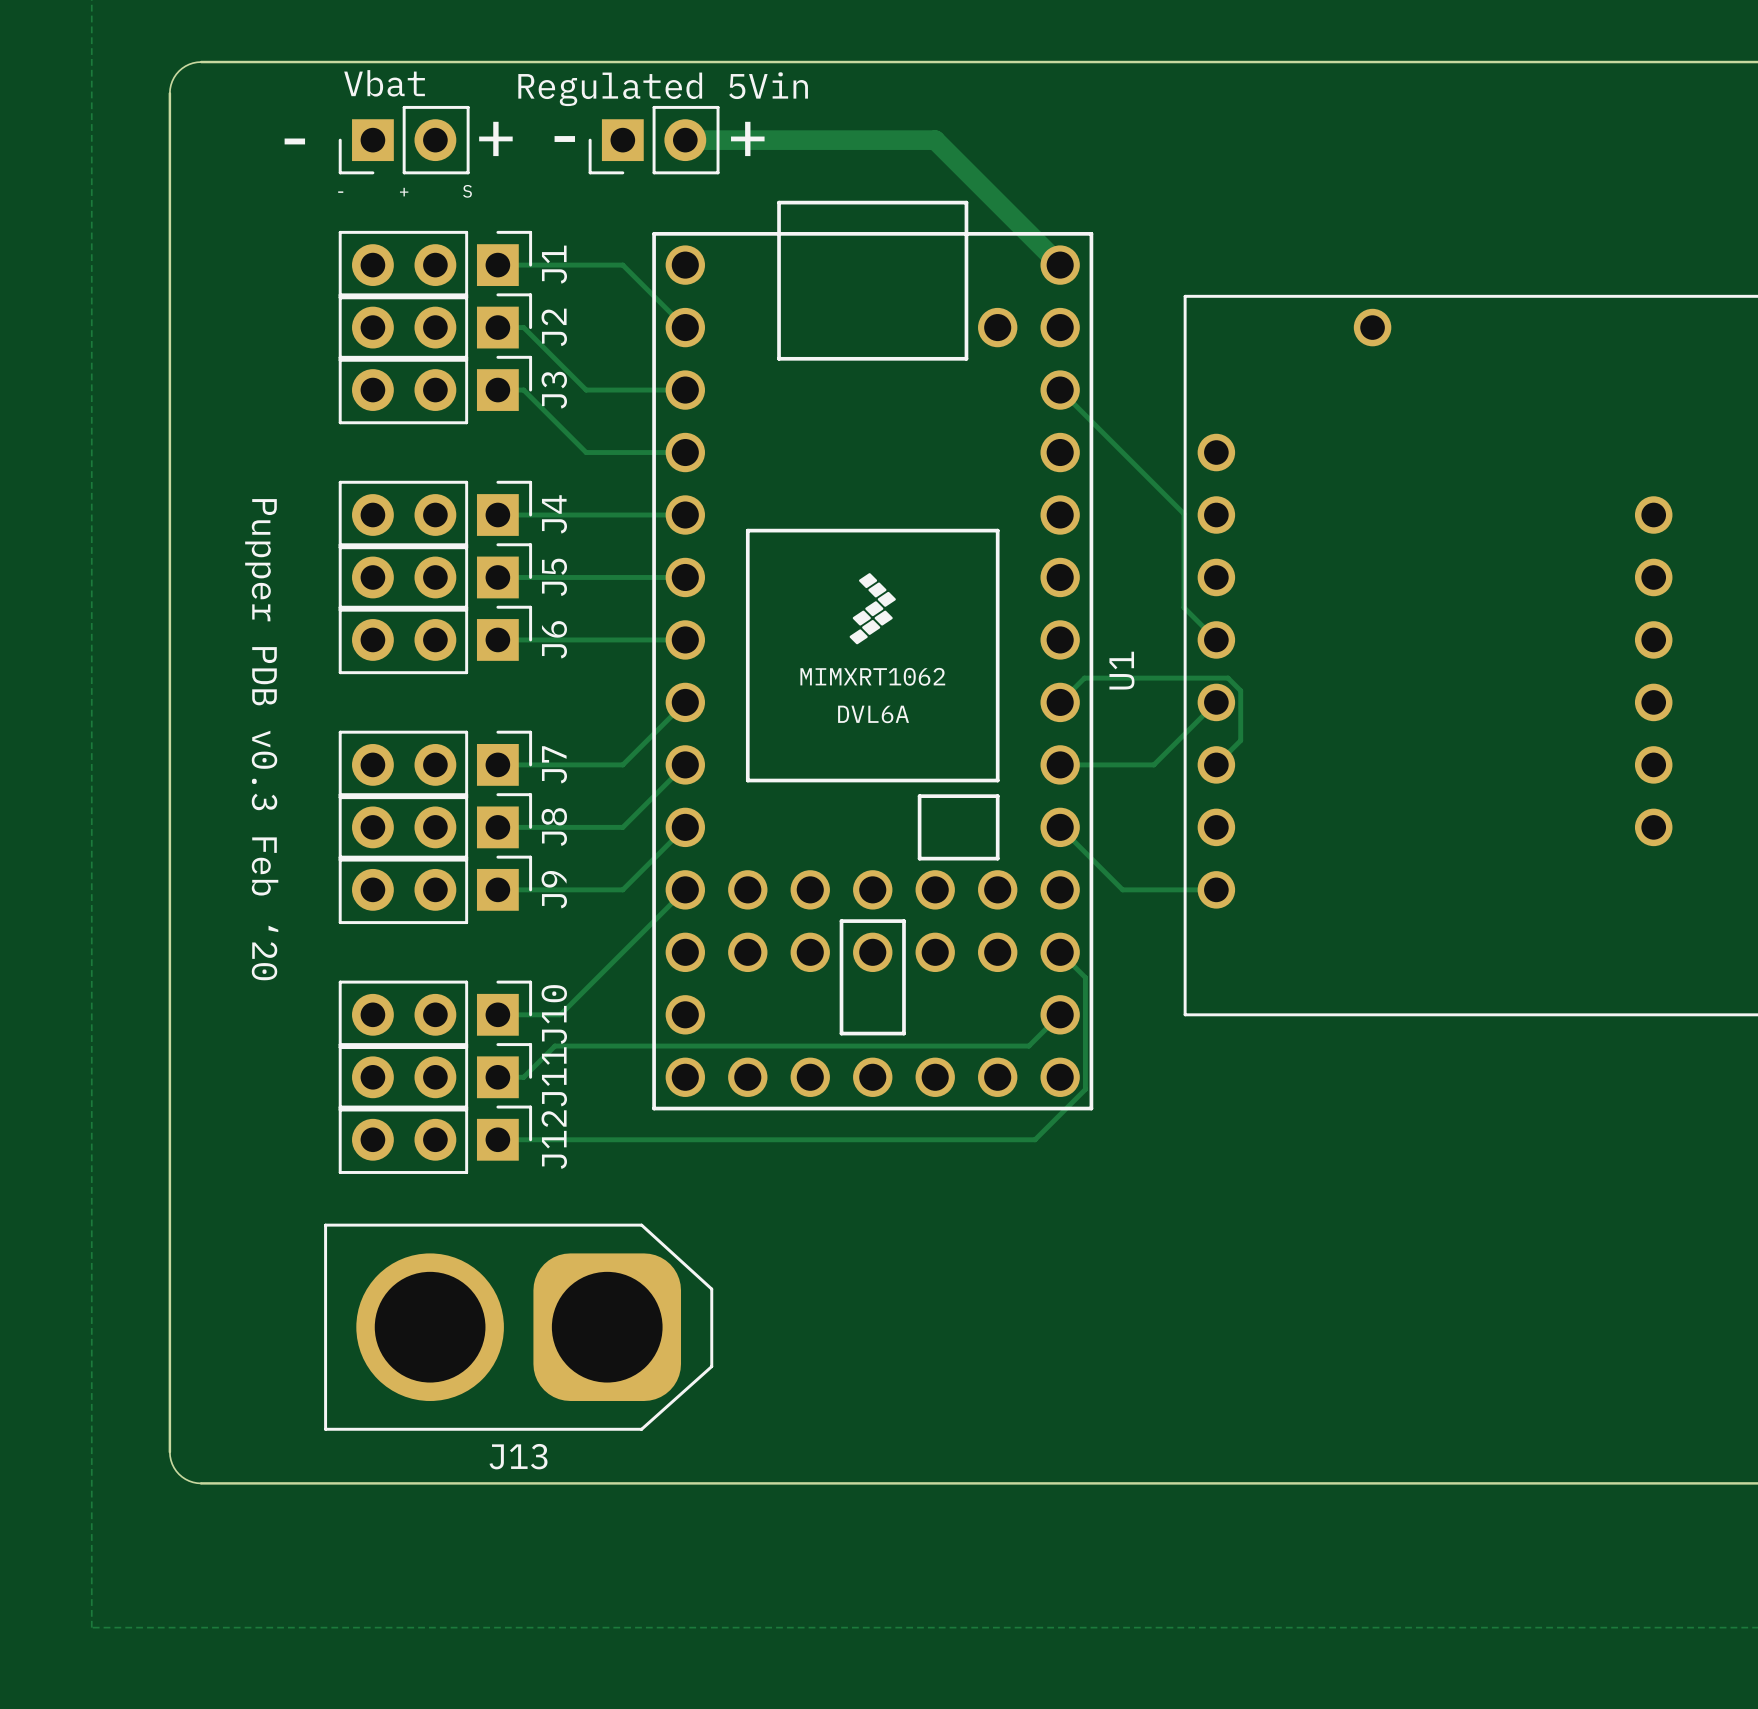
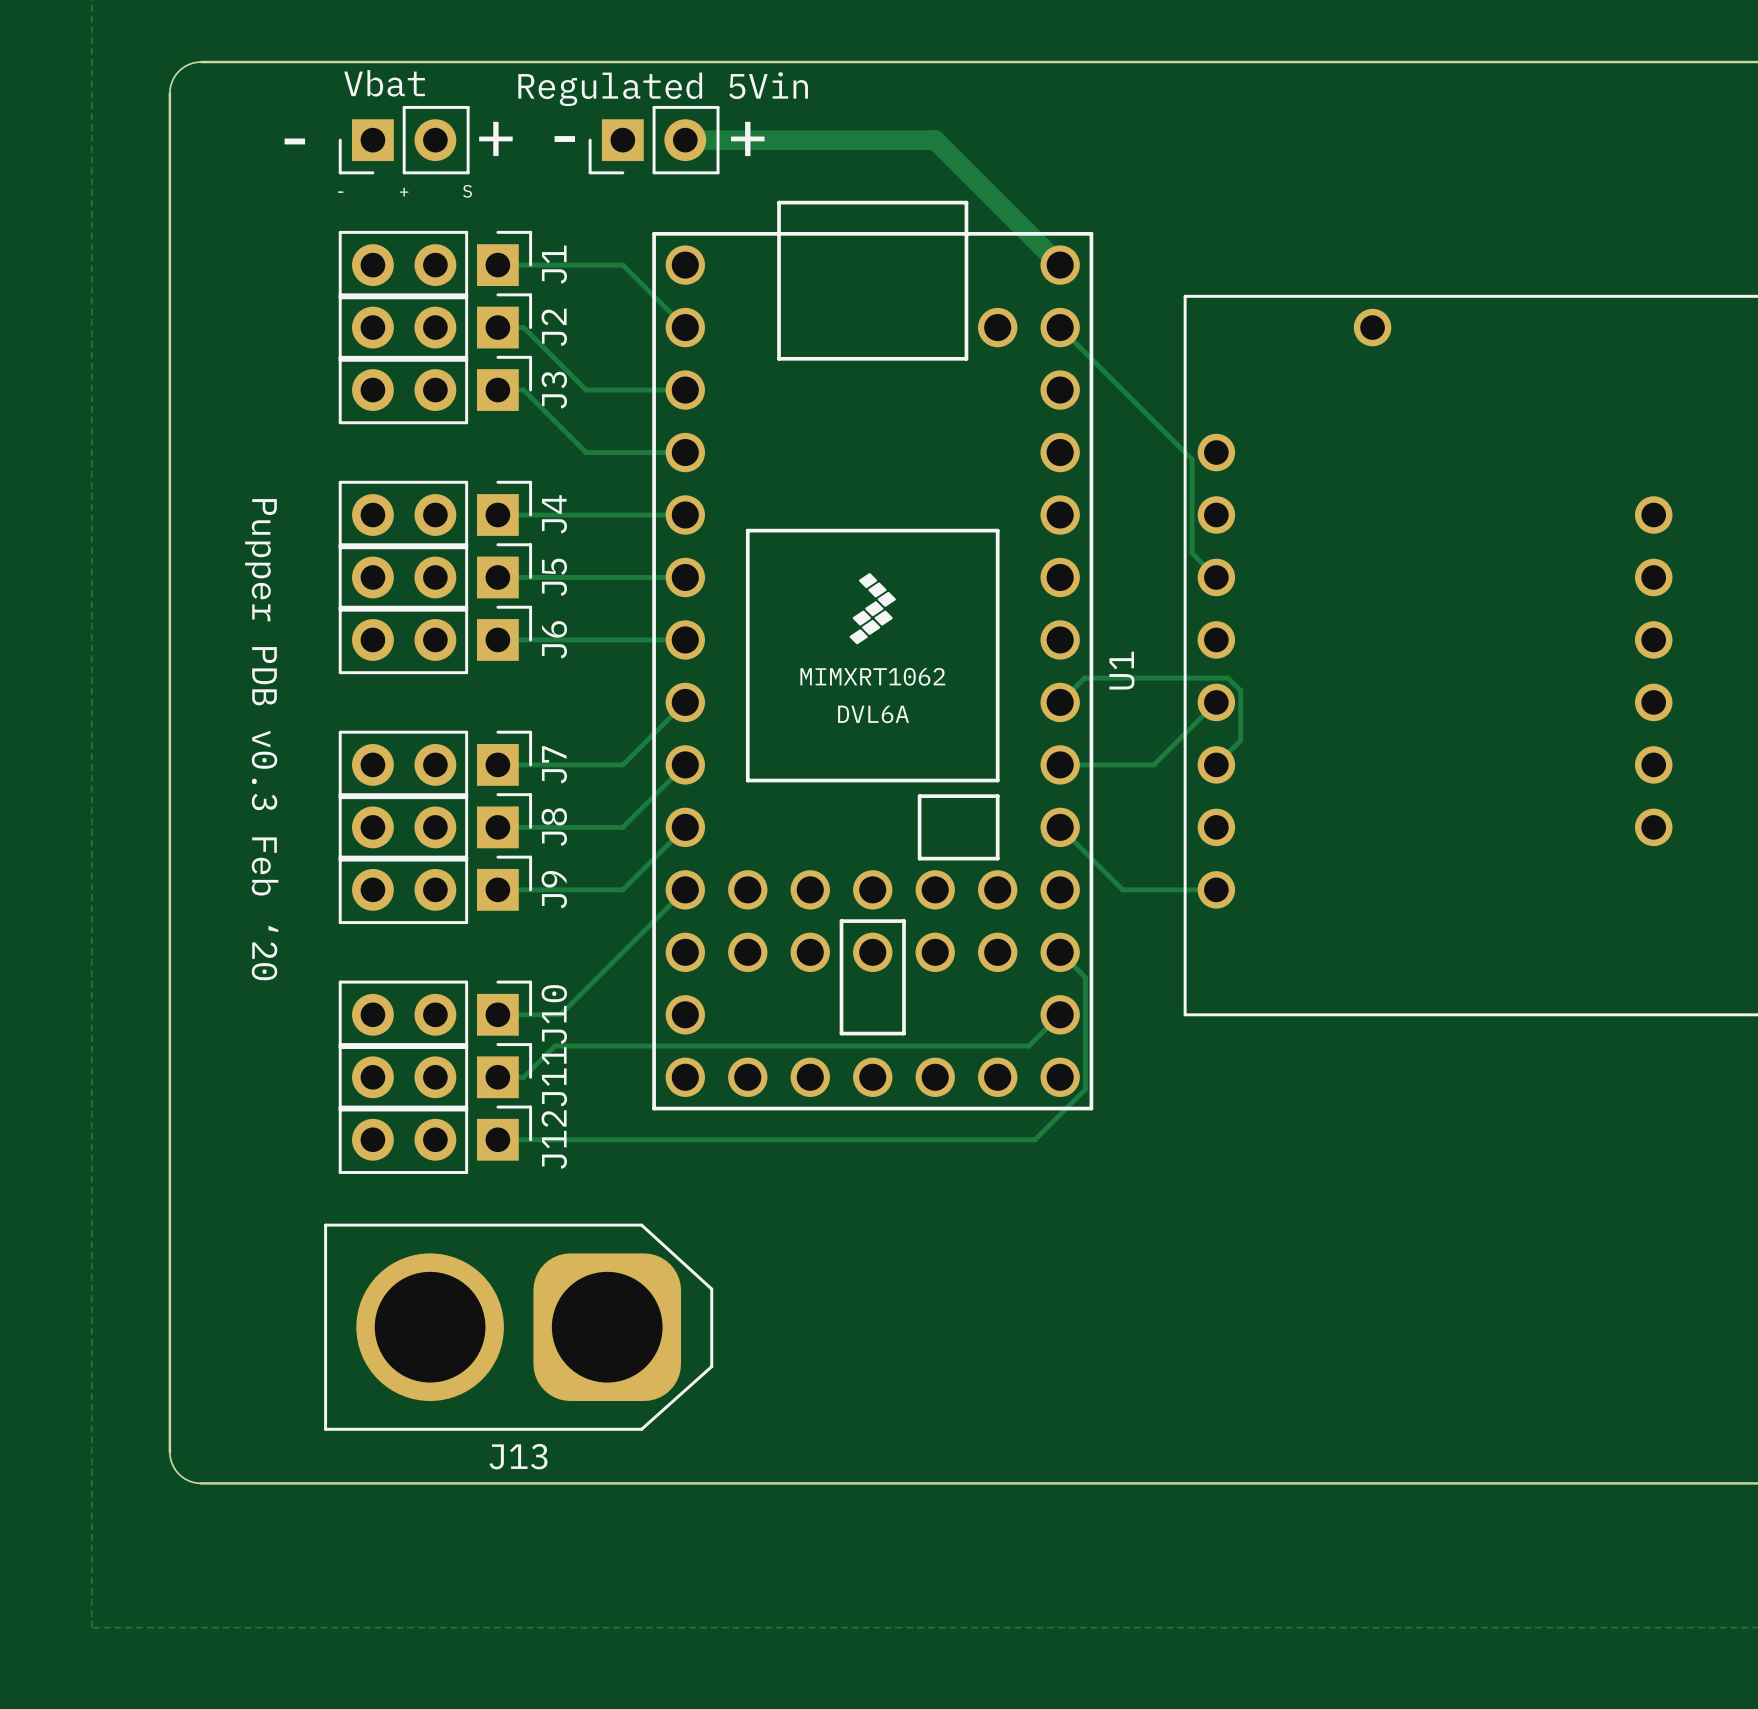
track: none -> (1060, 327) (1192, 459) (1192, 553) (1216, 577)
track: (1060, 390) (1184, 513) (1184, 607) (1216, 639) -> none

